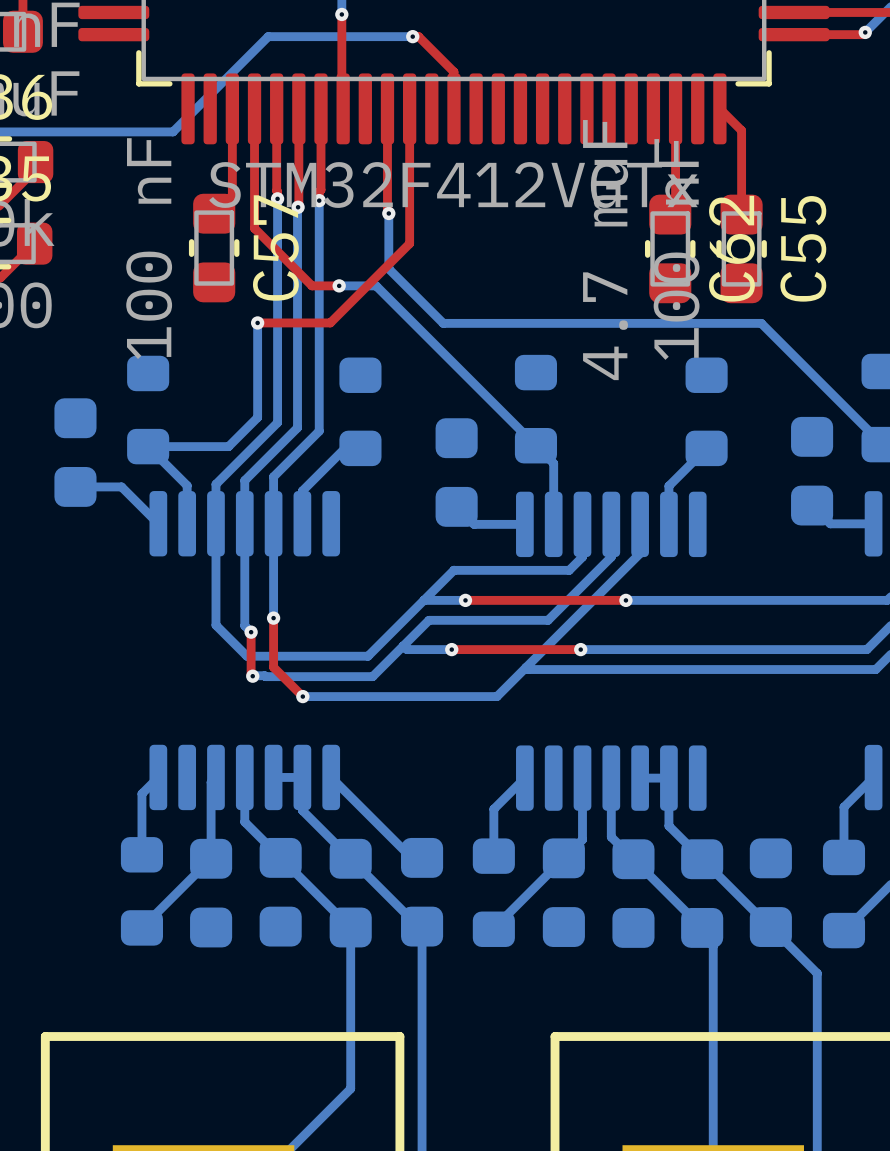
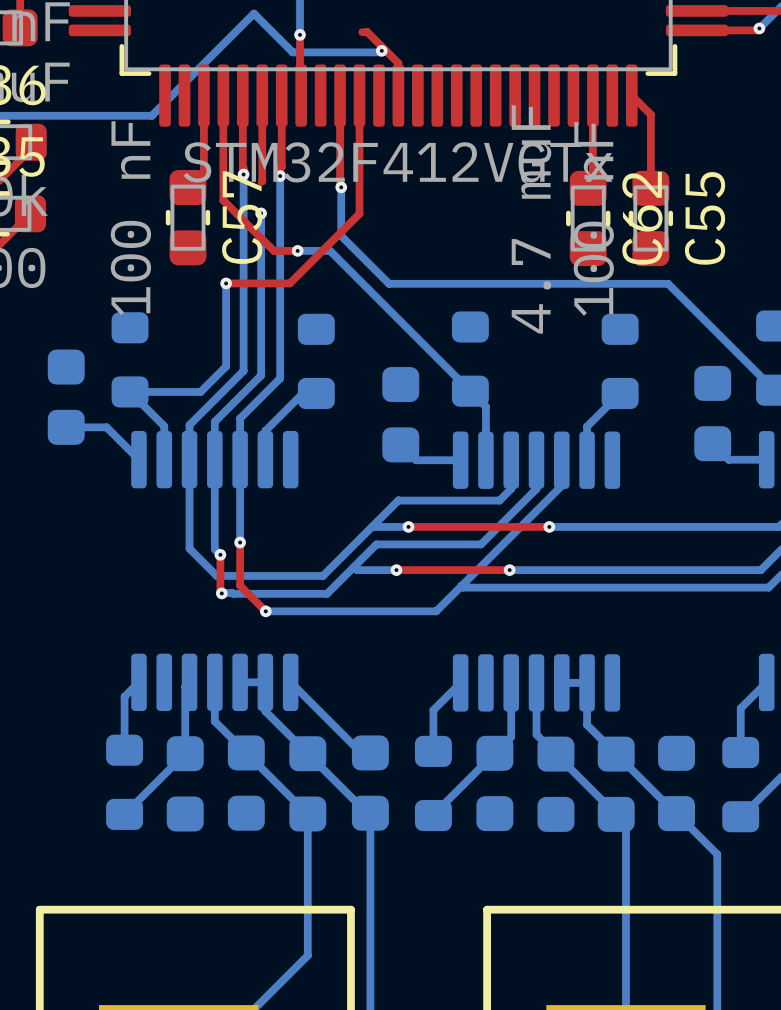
top track: (341, 14) (341, 39) -> none
bottom track: none -> (300, 12) (300, 34)
via position: (341, 14) -> (300, 34)
bottom track: (268, 36) (412, 36) -> (235, 32) (253, 13) (292, 52) (380, 52) (381, 50)
via position: (412, 36) -> (381, 50)
bottom track: (297, 207) (297, 243) -> none
via position: (298, 207) -> (261, 213)

